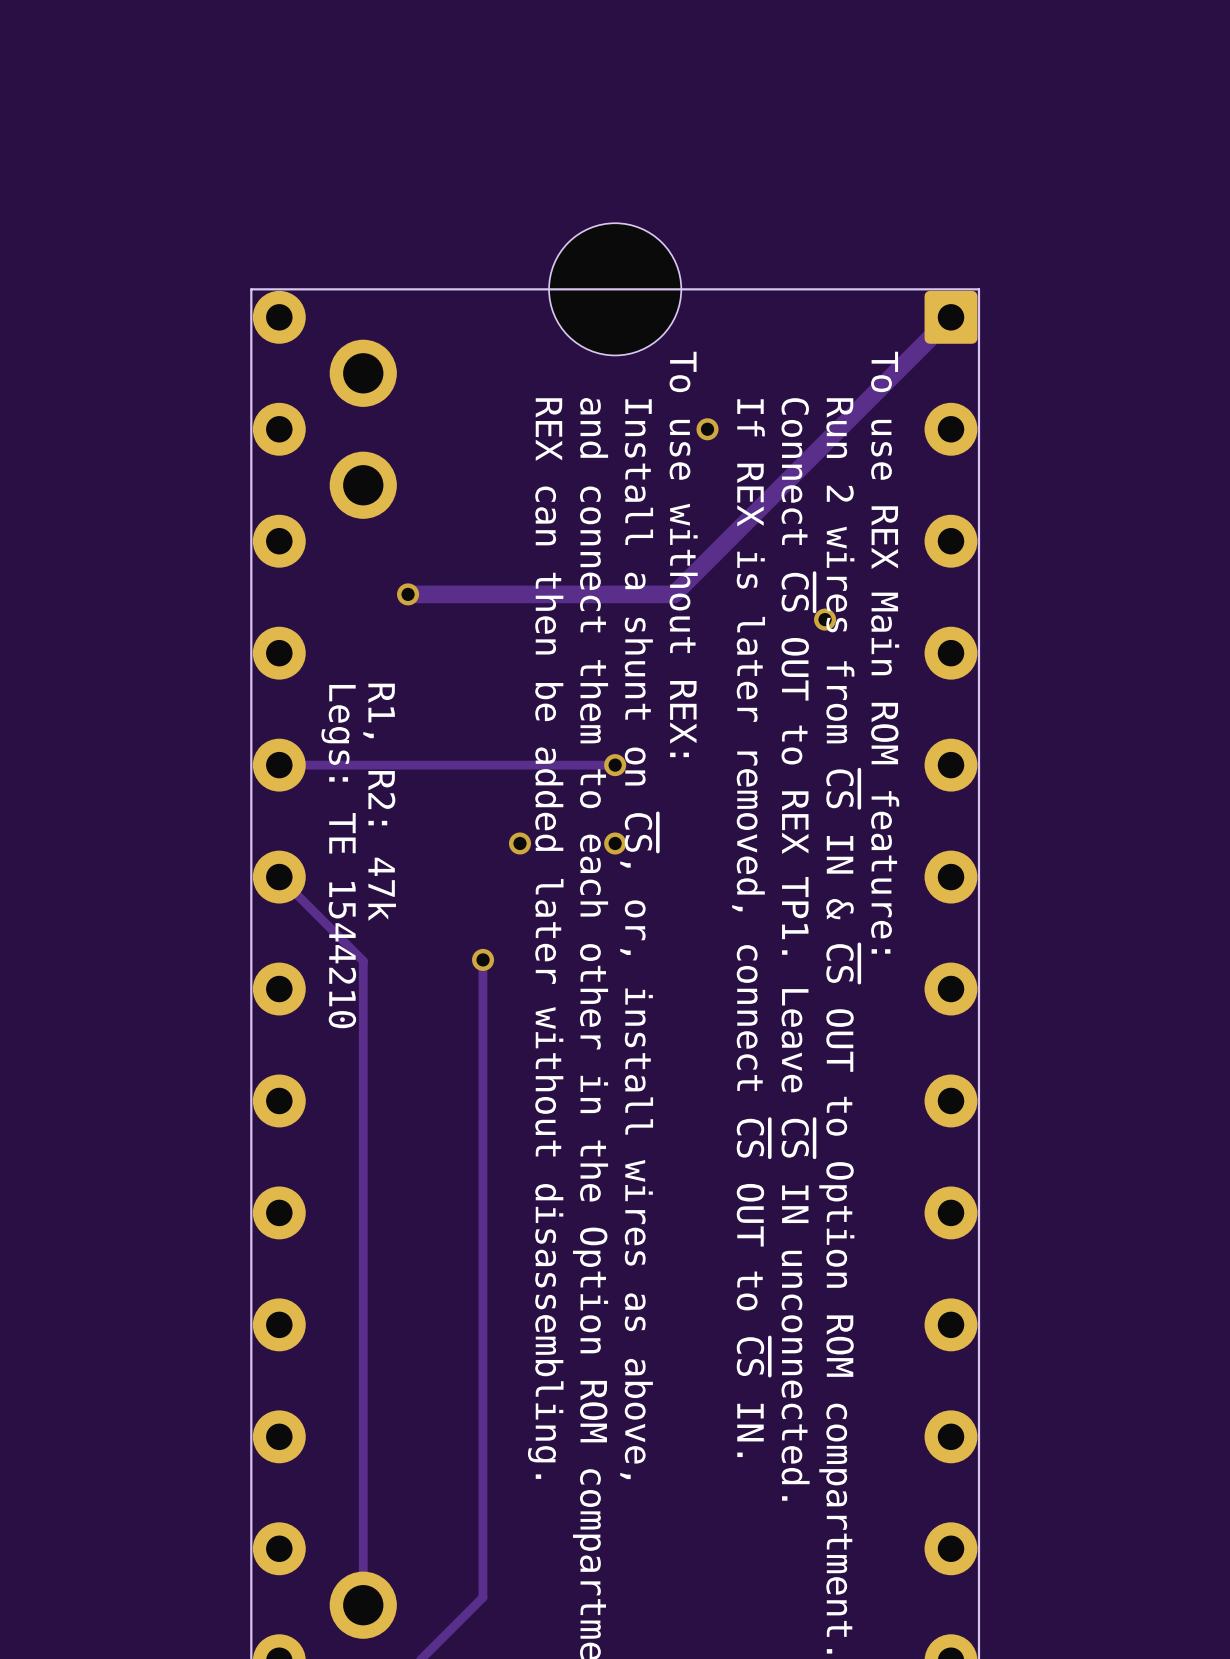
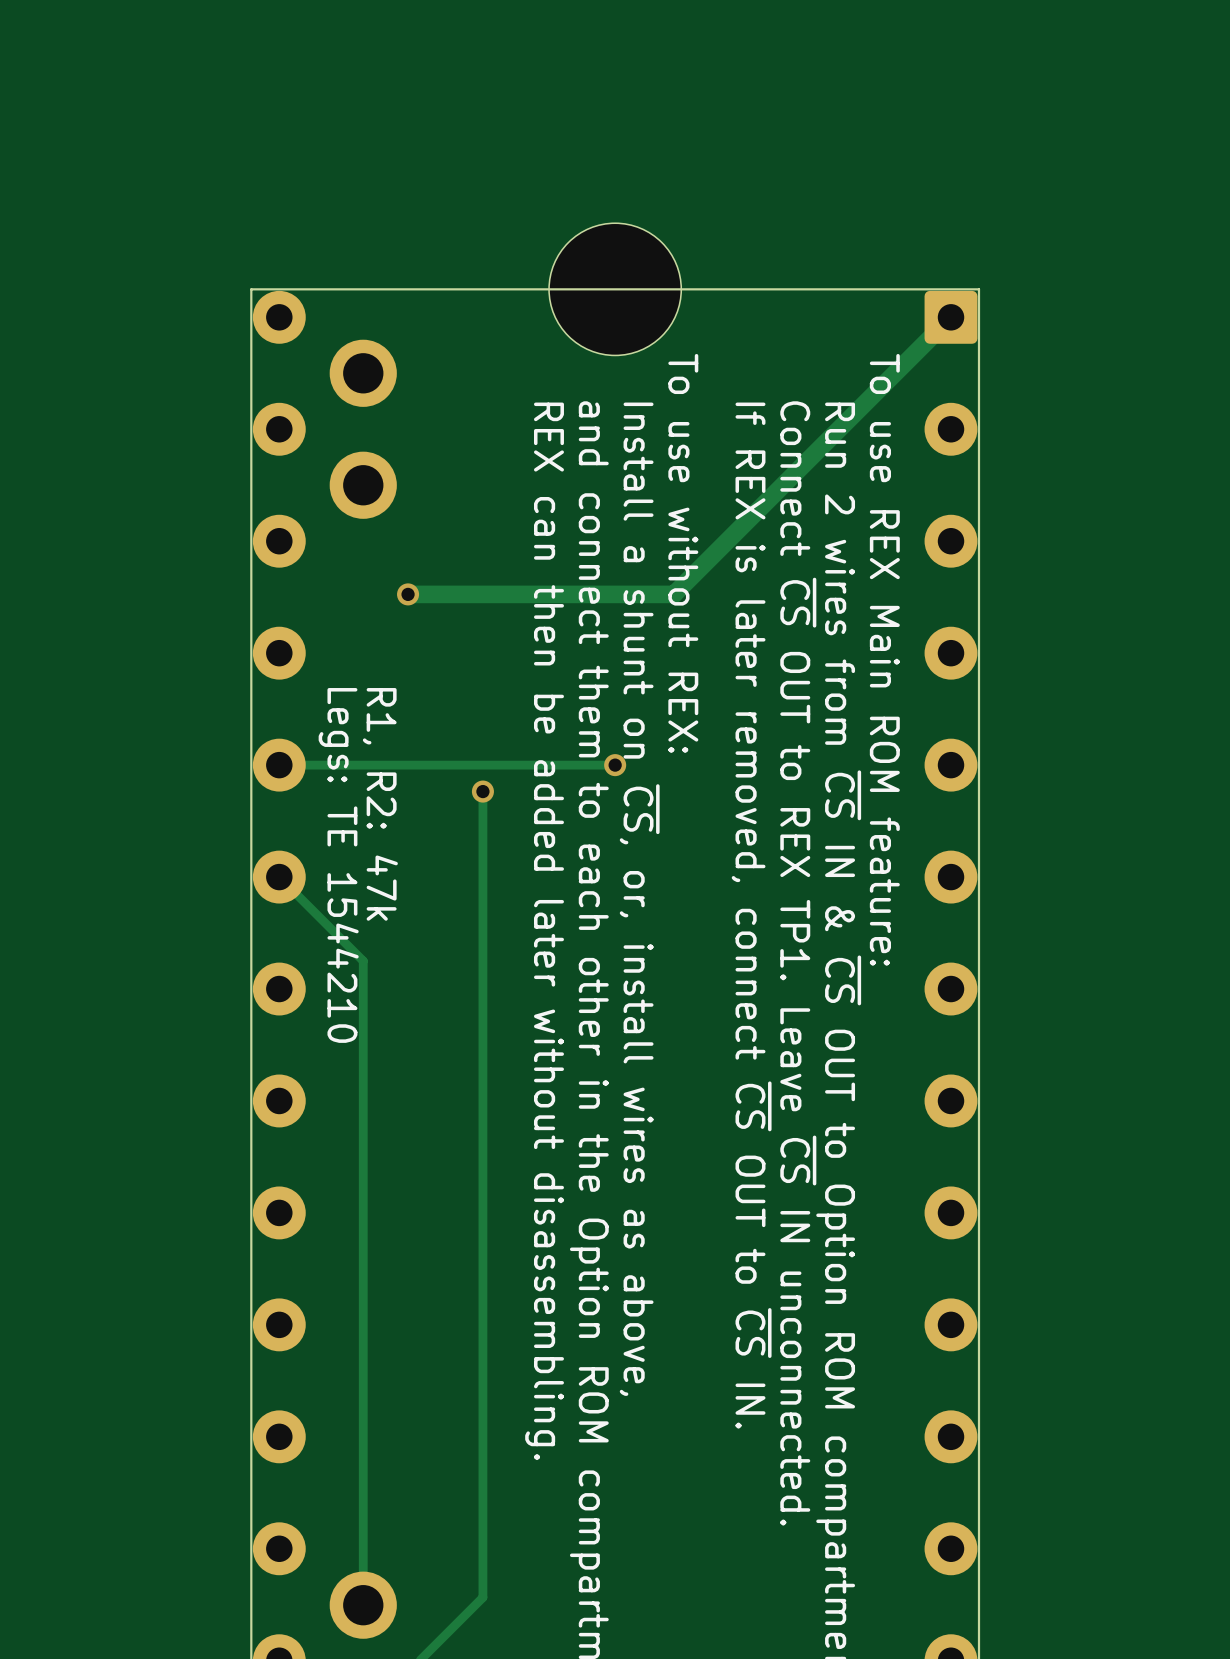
via: (707, 429) -> none
via: (825, 619) -> none
track: none -> (482, 791) (482, 960)
via position: (520, 843) -> (482, 791)
via: (615, 843) -> none
via: (483, 959) -> none

